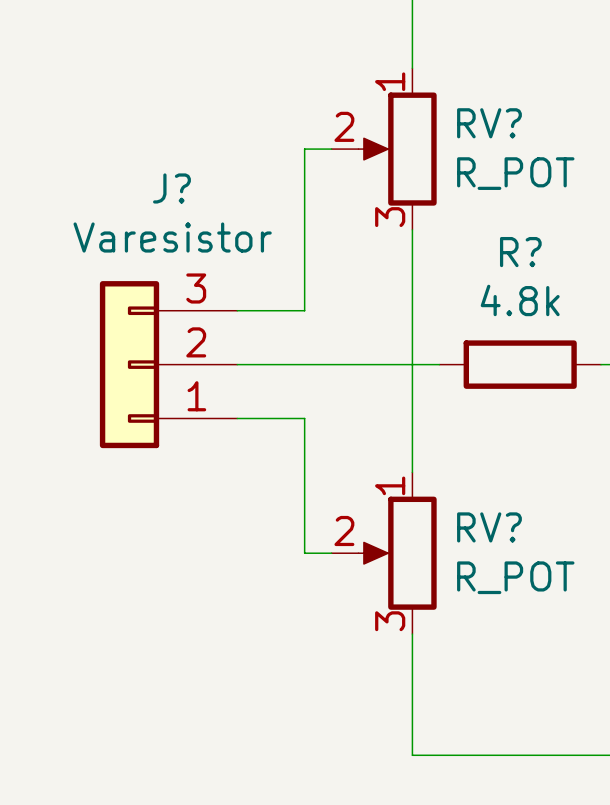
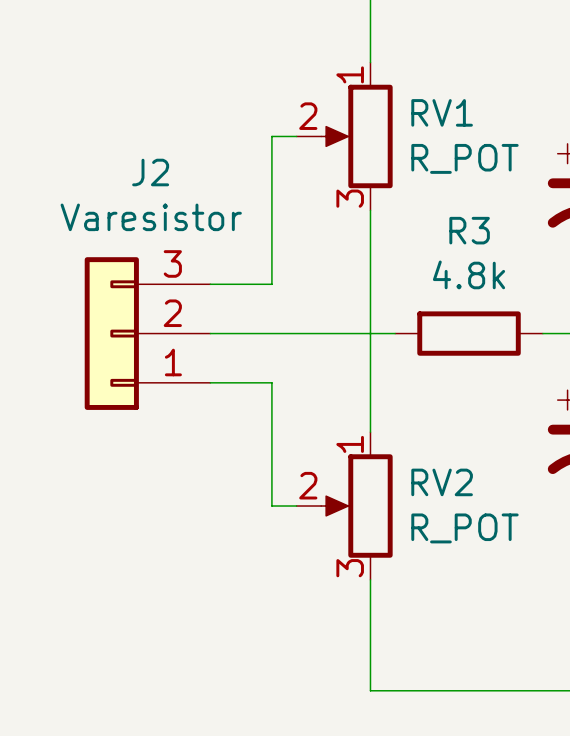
RV? name: RV? (489, 123) -> RV1 (442, 112)
J? name: J? (171, 188) -> J2 (150, 172)
R? name: R? (520, 252) -> R3 (469, 230)
RV? name: RV? (489, 527) -> RV2 (442, 482)

